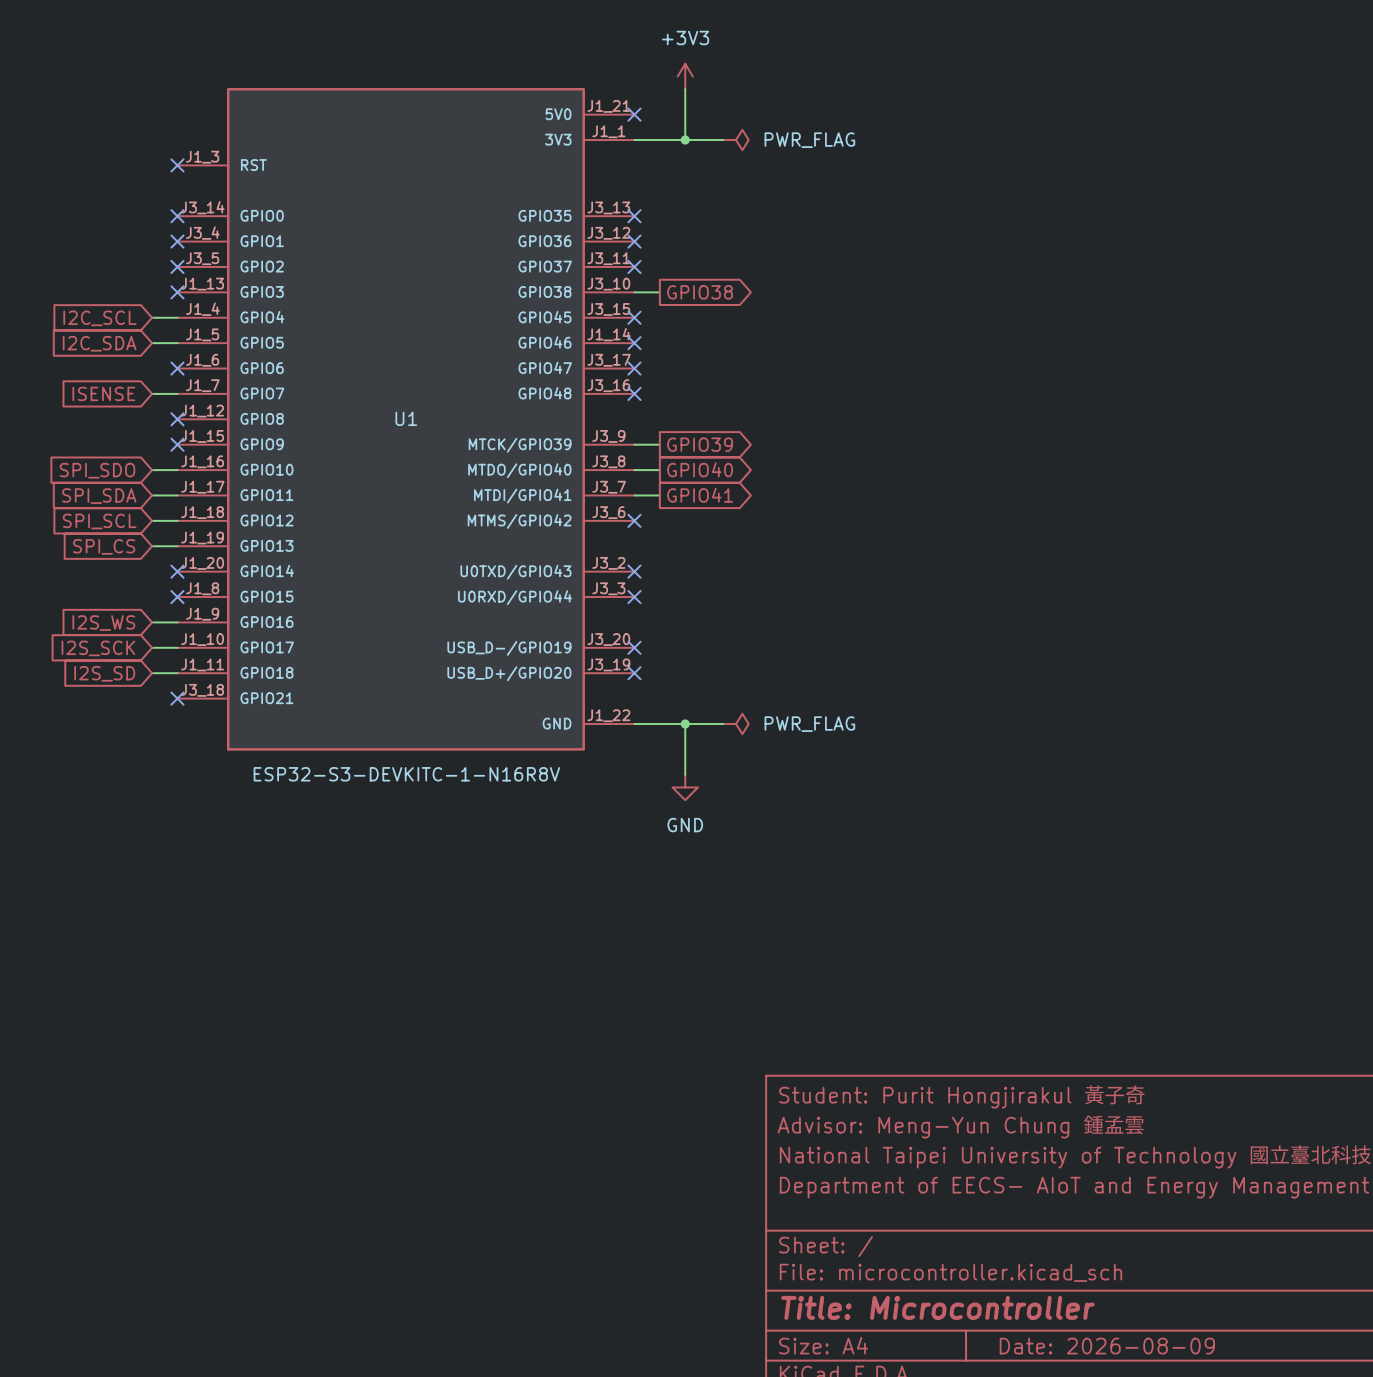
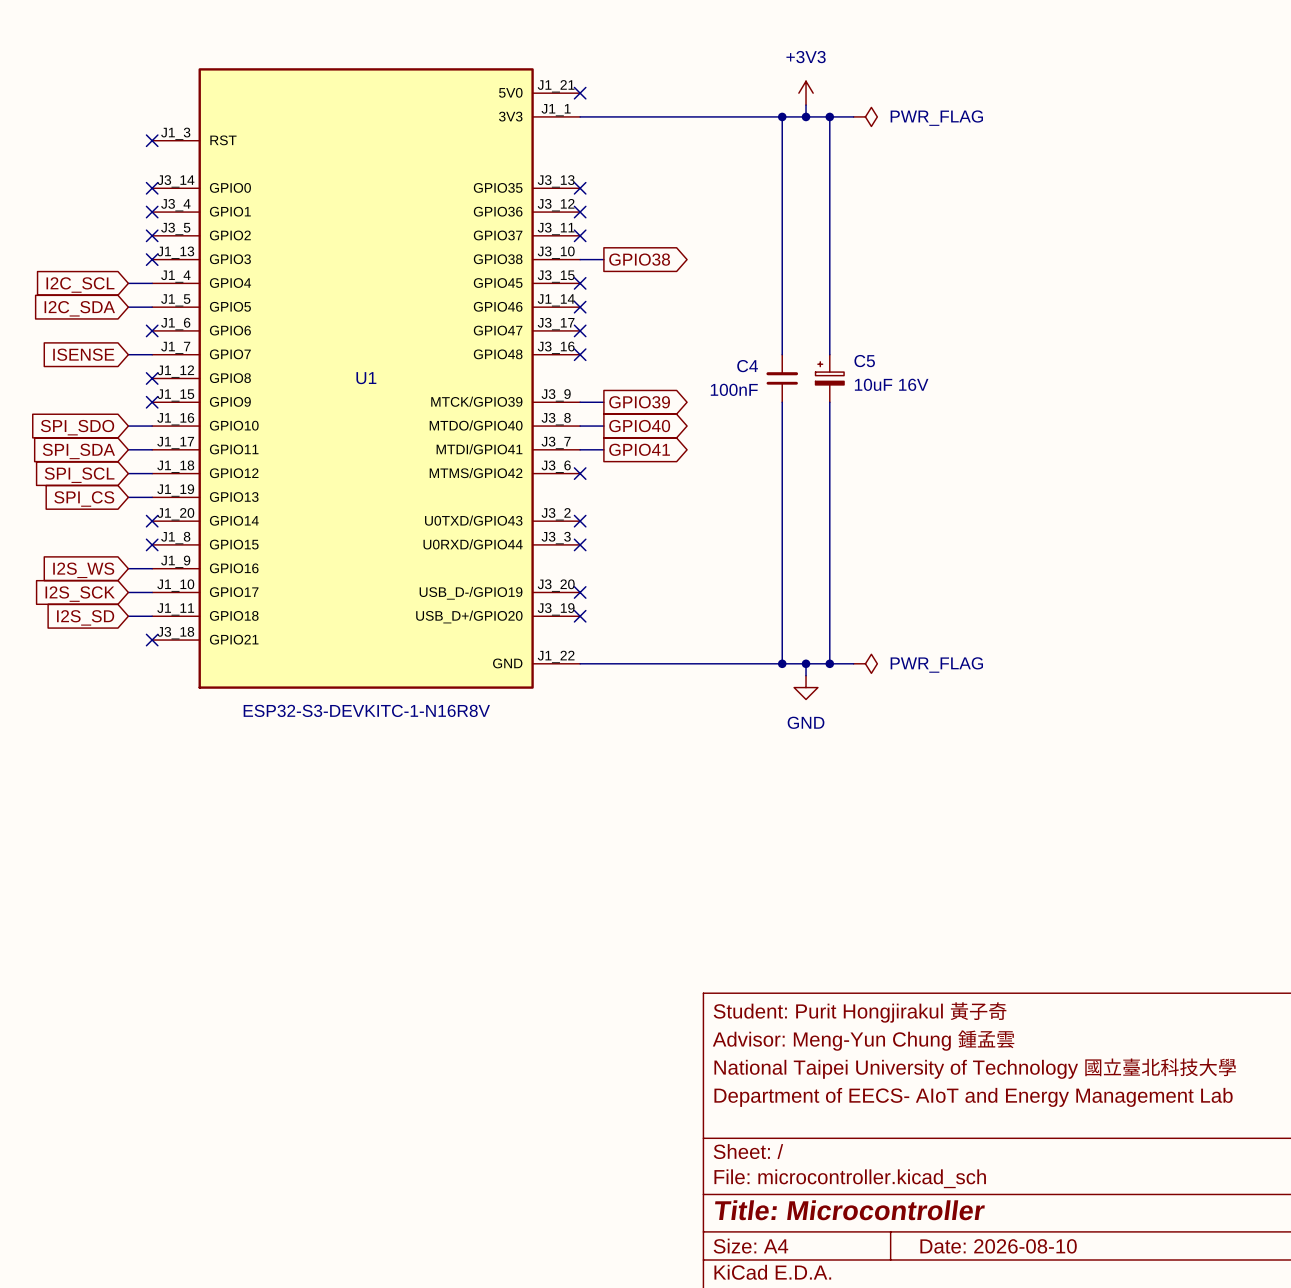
power symbol position: +3V3 (685, 76) -> +3V3 (806, 93)
wire: (685, 89) (685, 140) -> none
wire: none -> (806, 105) (806, 116)
junction: (685, 140) -> none
wire: none -> (663, 116) (853, 116)
power symbol position: PWR_FLAG (736, 140) -> PWR_FLAG (865, 116)
wire: none -> (782, 116) (782, 354)
junction: none -> (782, 116)
junction: none -> (806, 116)
wire: none -> (829, 116) (829, 354)
junction: none -> (829, 116)
C4: none -> 100nF (782, 378)
C5: none -> 10uF 16V (829, 378)
wire: none -> (782, 402) (782, 663)
wire: none -> (829, 402) (829, 663)
wire: (685, 723) (685, 774) -> none
junction: (685, 723) -> none
wire: none -> (663, 663) (853, 663)
power symbol position: PWR_FLAG (736, 723) -> PWR_FLAG (865, 663)
junction: none -> (782, 663)
wire: none -> (806, 663) (806, 675)
junction: none -> (806, 663)
junction: none -> (829, 663)
power symbol position: GND (685, 787) -> GND (806, 687)
title block: Date: 2026-08-09 (1107, 1346) -> Date: 2026-08-10 (998, 1246)

